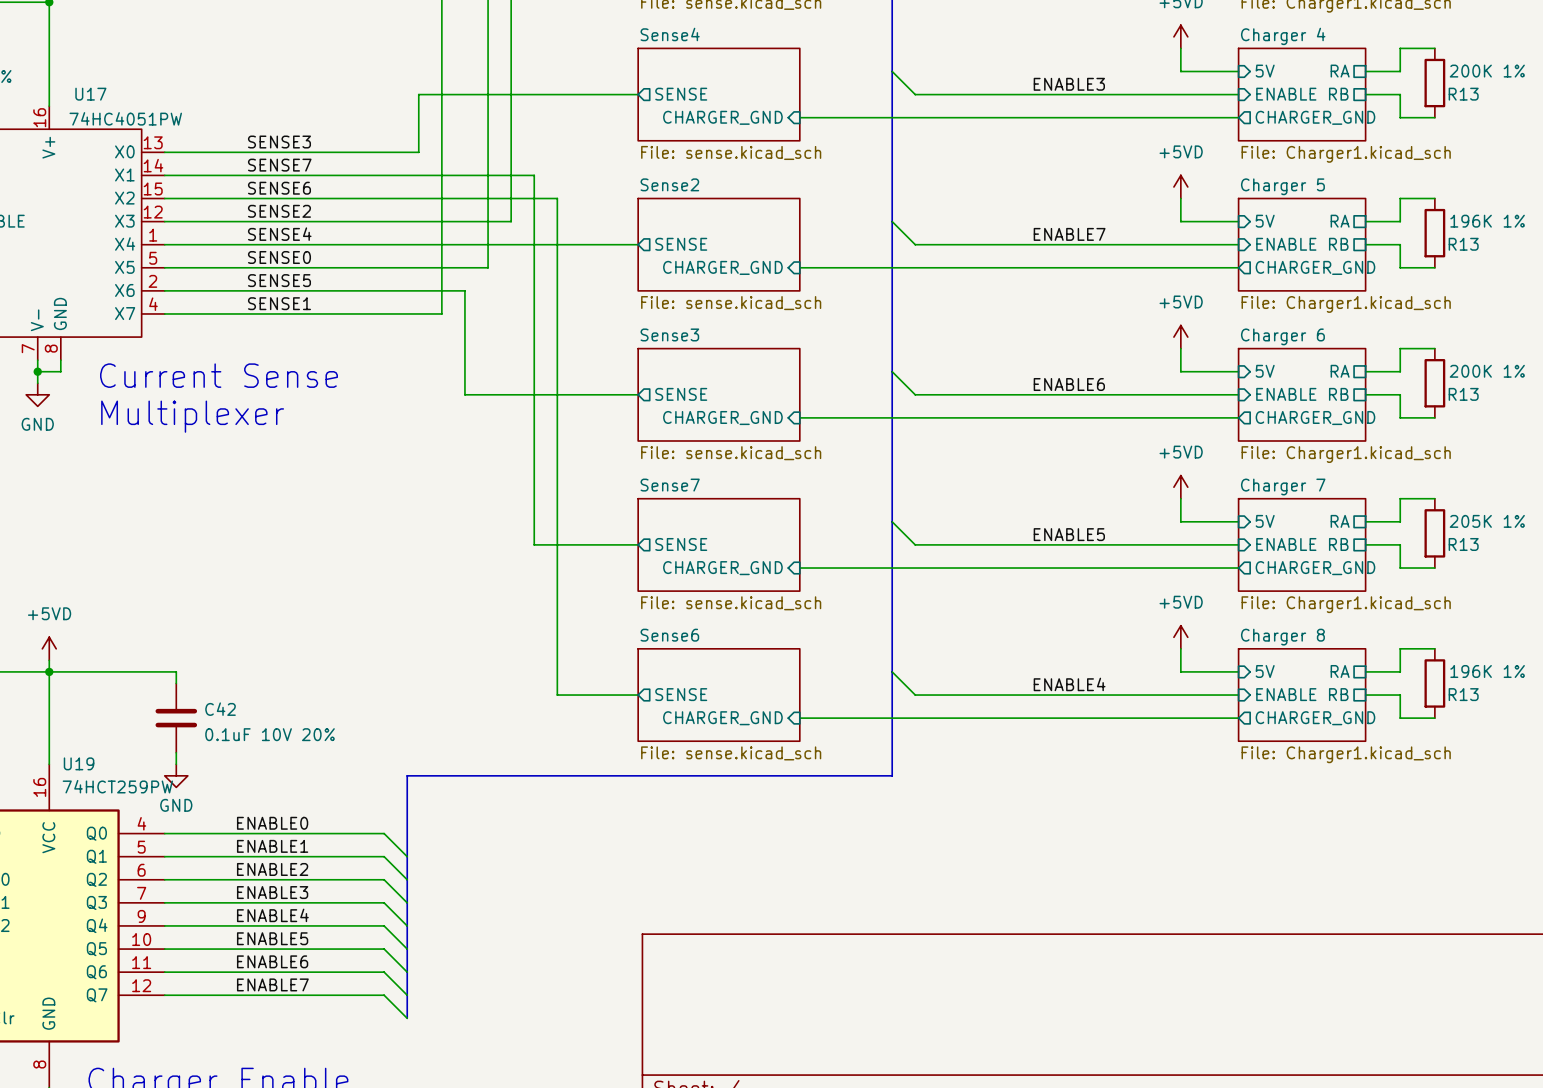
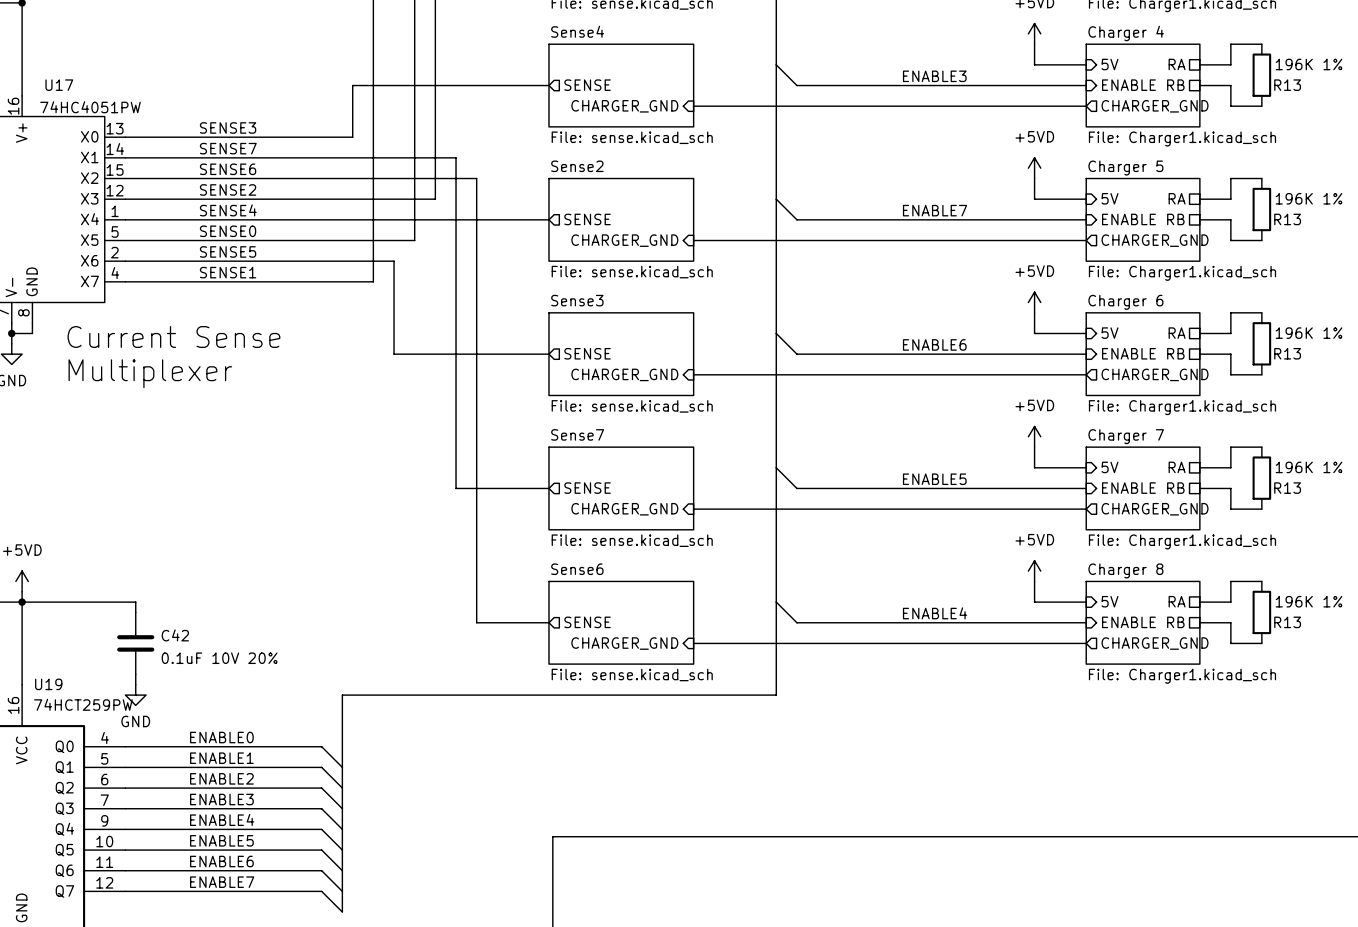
R13 value: 200K 1% (1487, 71) -> 196K 1% (1309, 64)
R13 value: 200K 1% (1487, 371) -> 196K 1% (1309, 333)
R13 value: 205K 1% (1487, 521) -> 196K 1% (1309, 467)

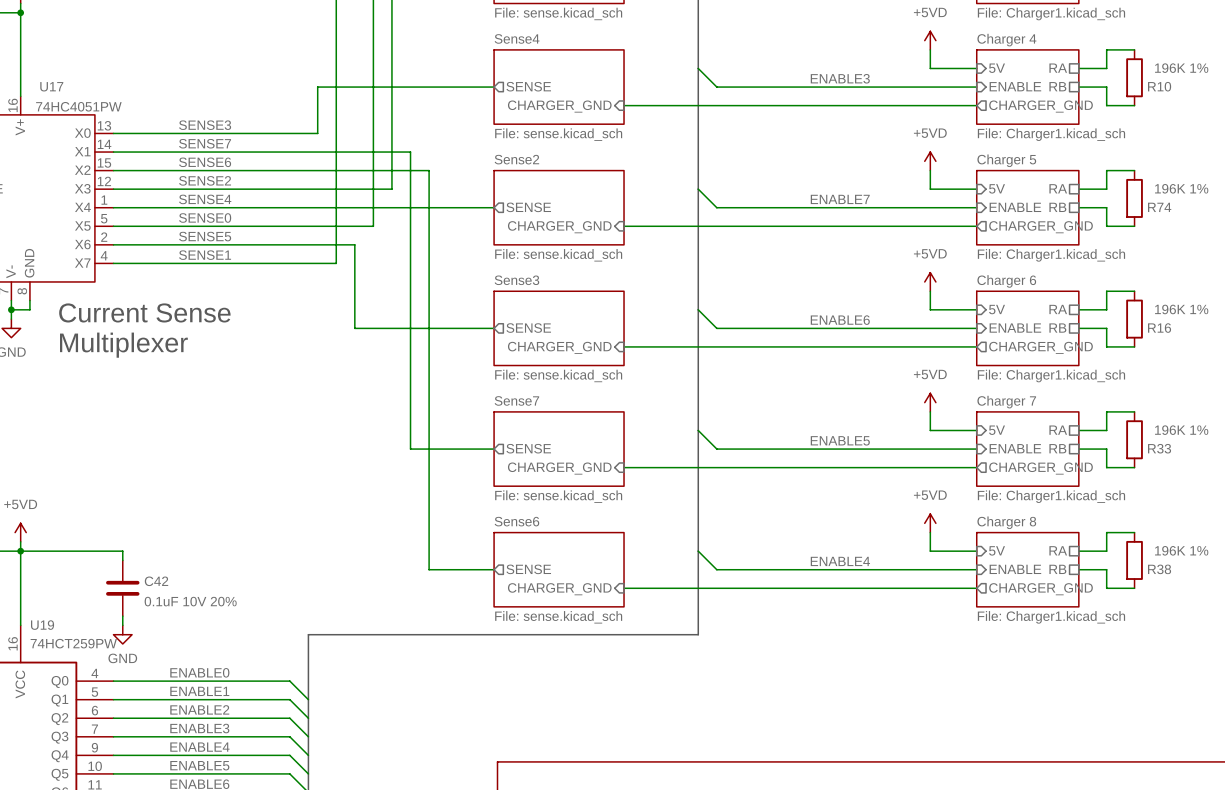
R13 name: R13 (1287, 85) -> R10 (1159, 86)
R13 name: R13 (1287, 219) -> R74 (1159, 207)
R13 name: R13 (1287, 353) -> R16 (1159, 328)
R13 name: R13 (1287, 488) -> R33 (1159, 448)
R13 name: R13 (1287, 622) -> R38 (1159, 569)

